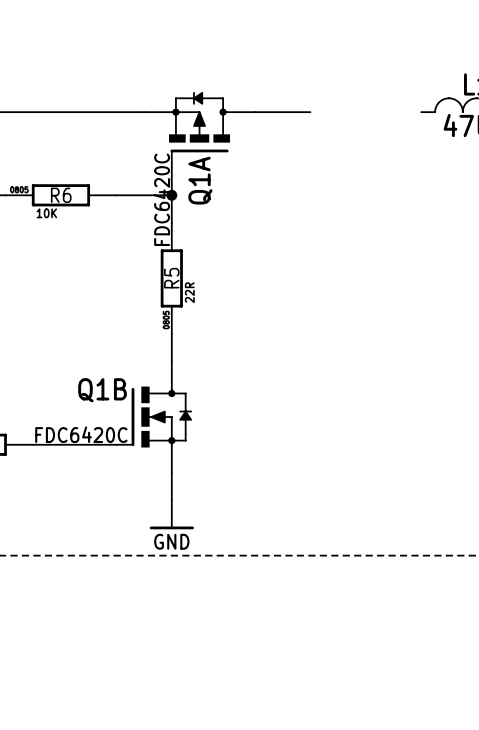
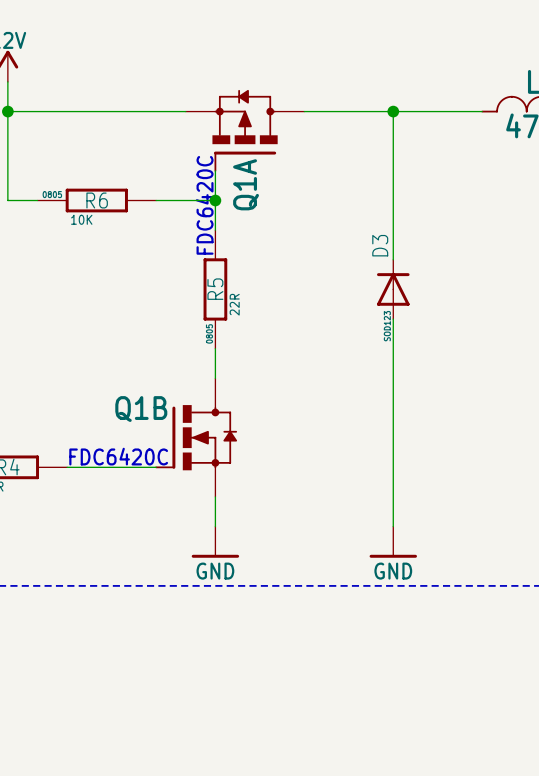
wire: none -> (363, 111) (482, 111)
wire: none -> (393, 111) (393, 259)
junction: none -> (393, 111)
D3: none -> (393, 289)
wire: none -> (393, 319) (393, 526)
power symbol: none -> GND (393, 542)

